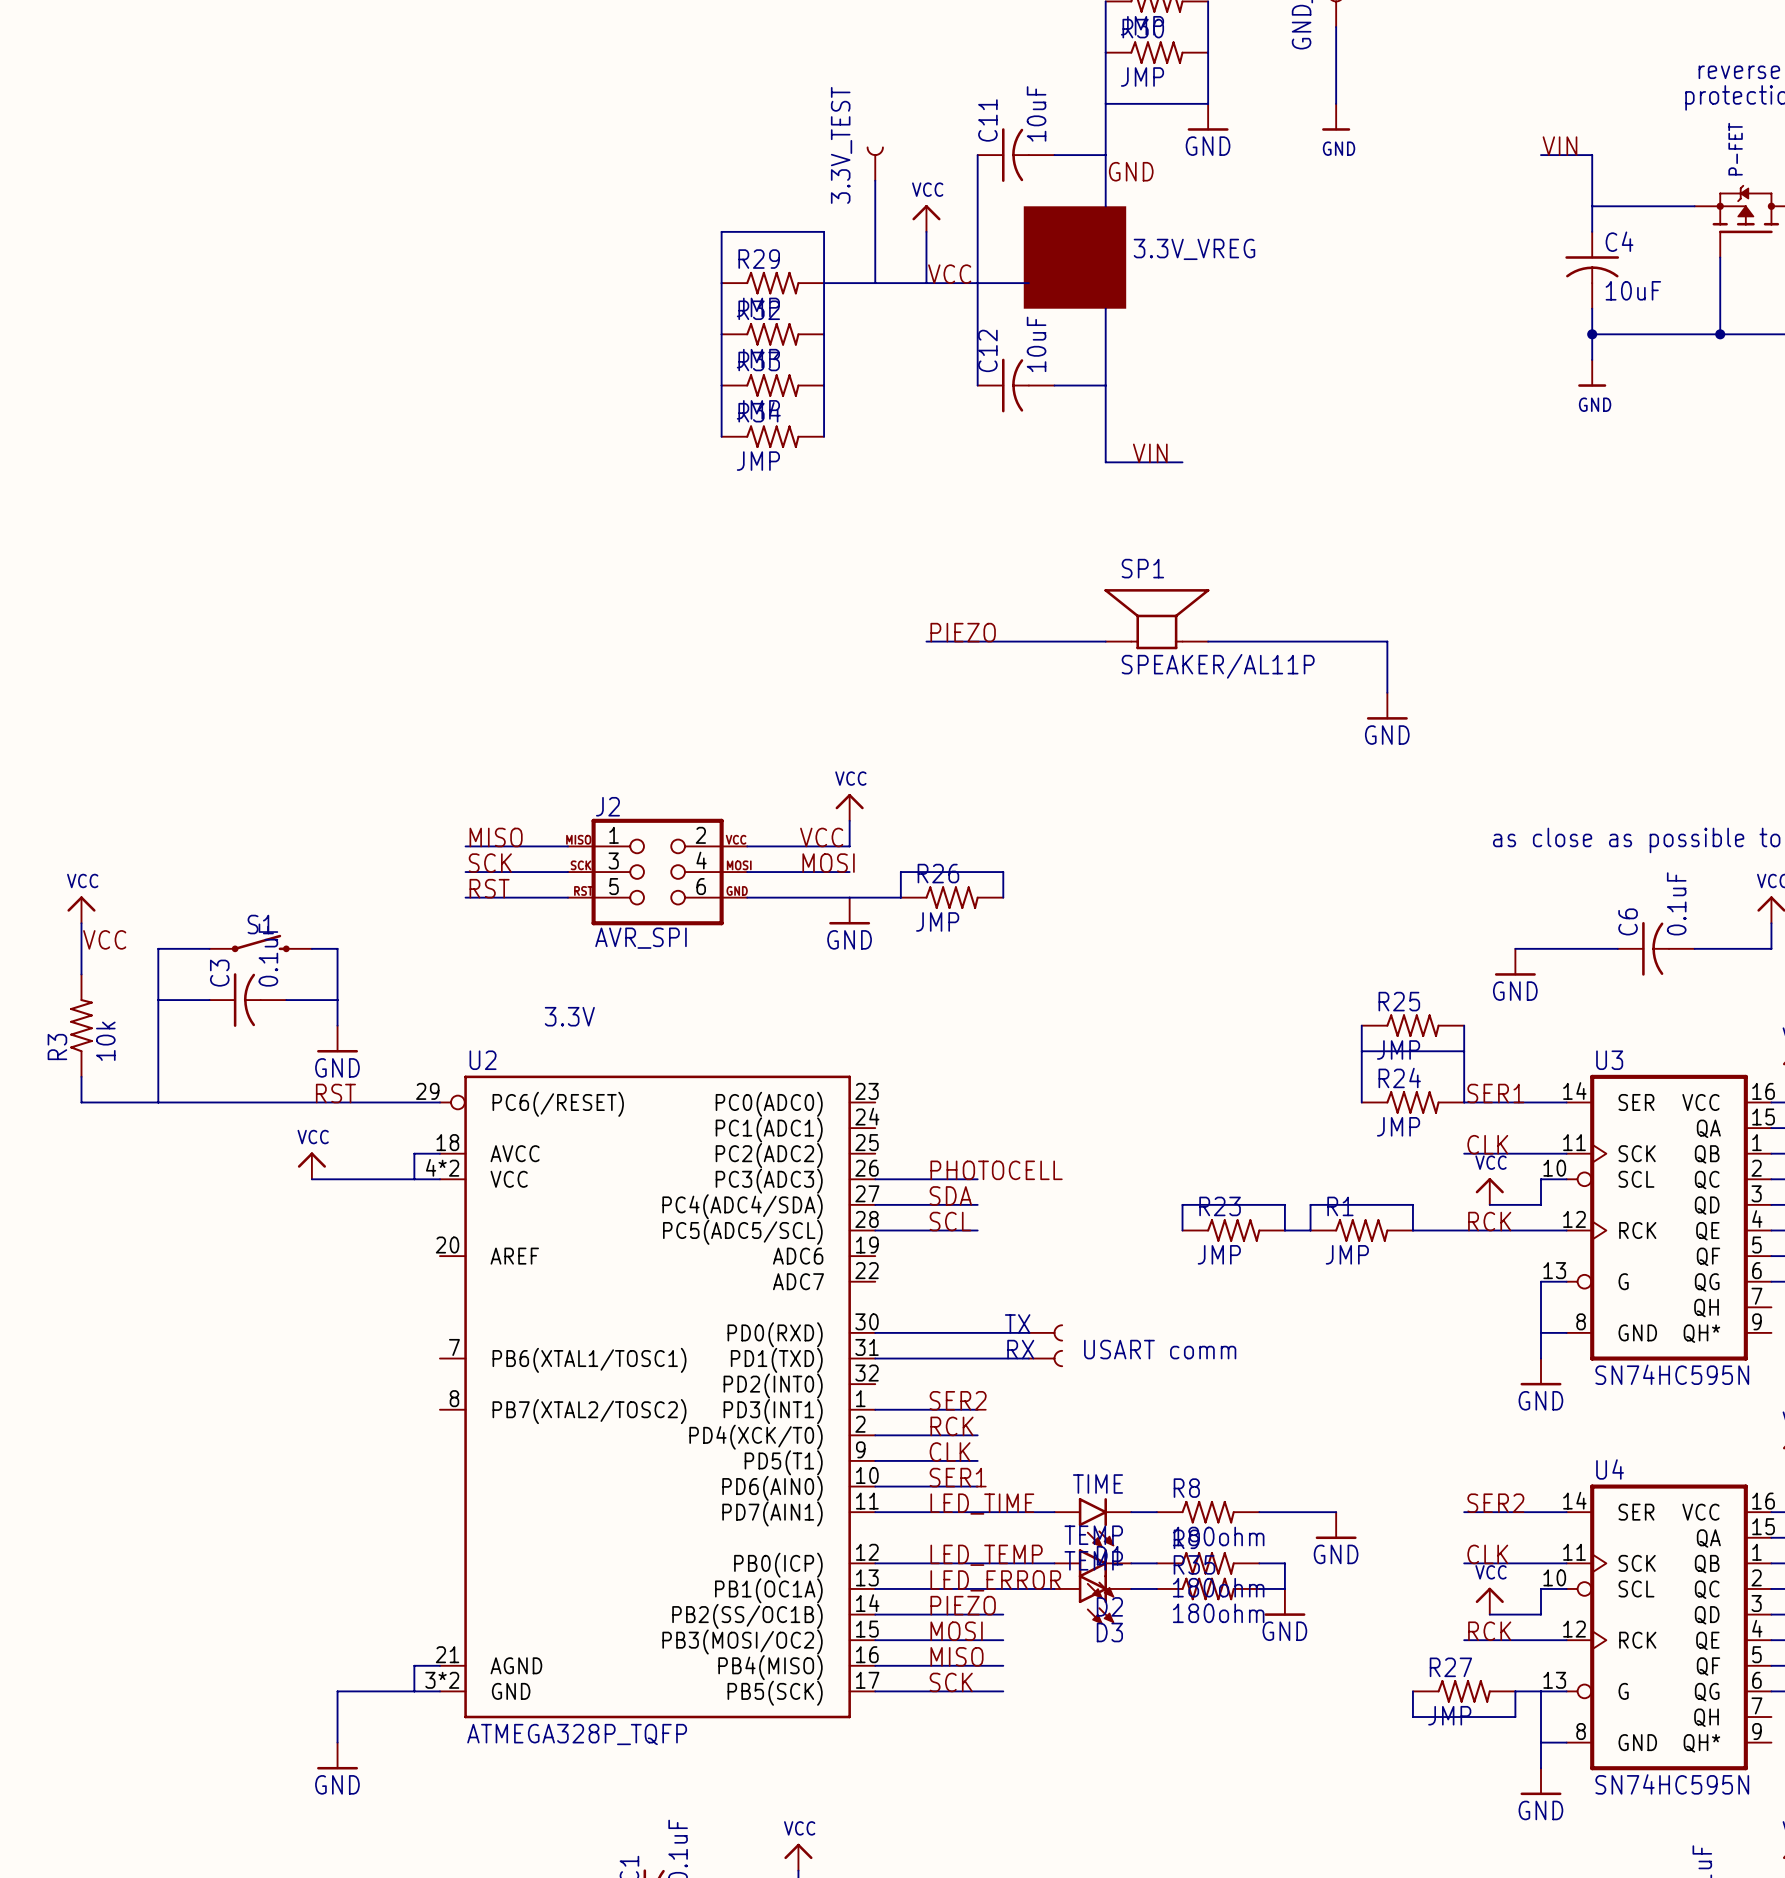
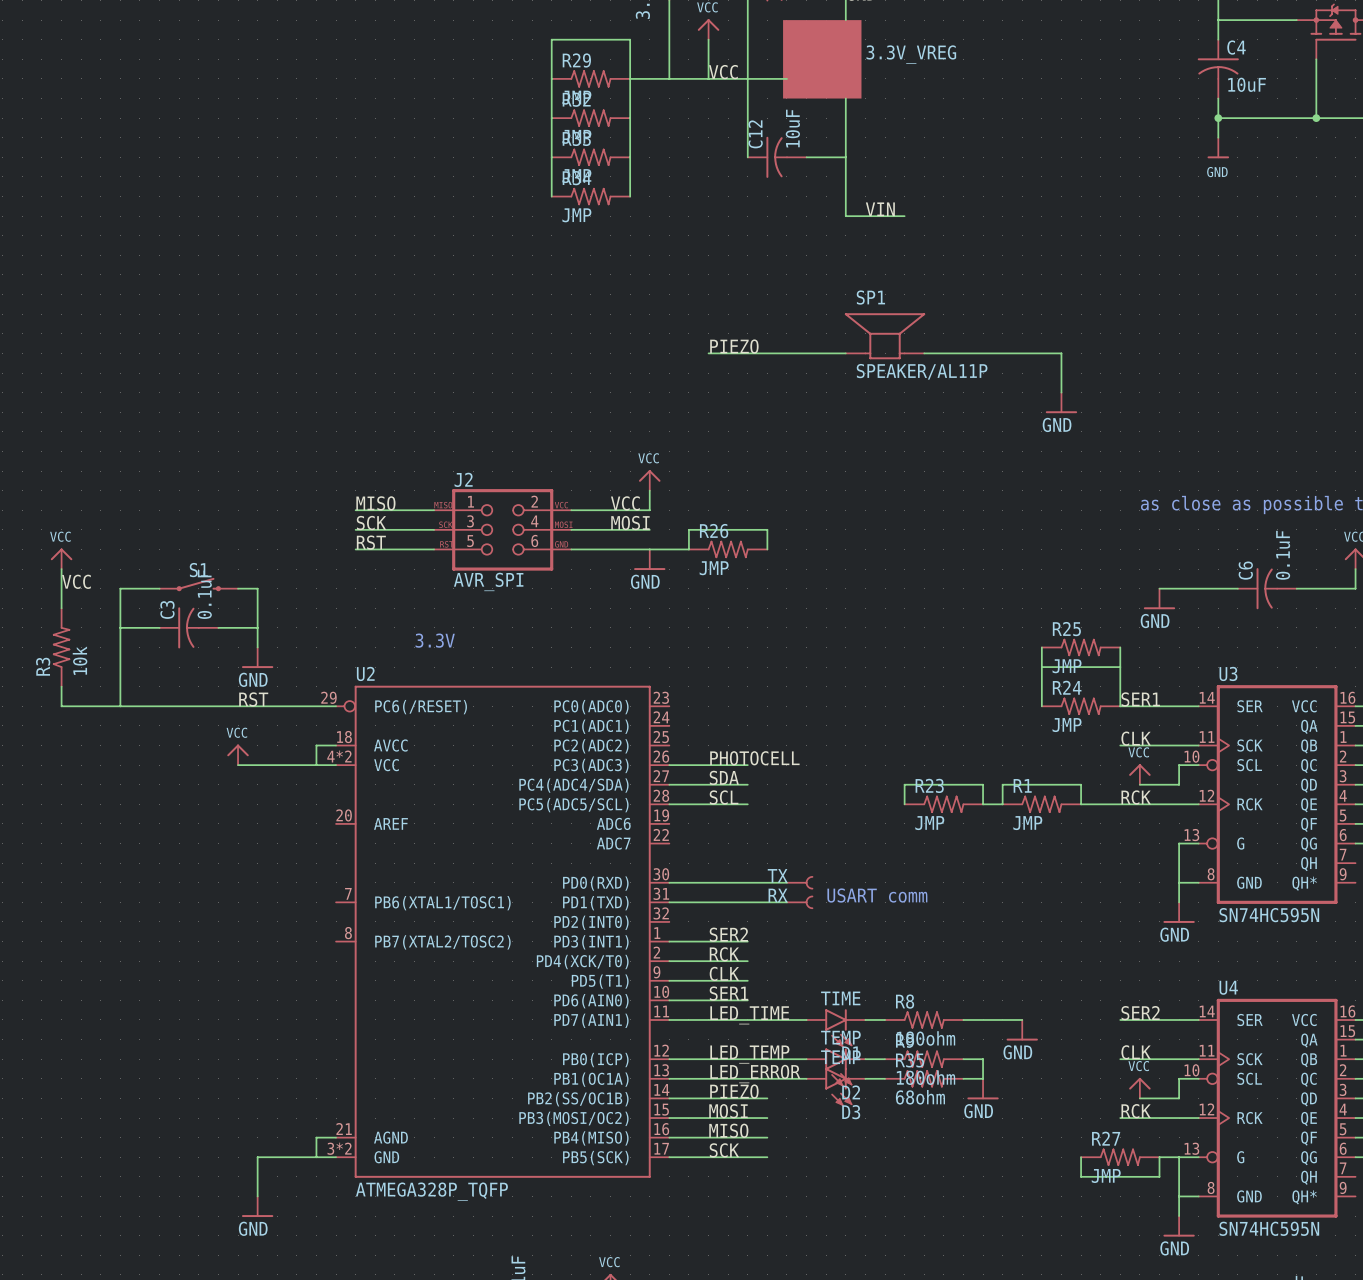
R35 value: 180ohm (1218, 1613) -> 68ohm (920, 1097)

